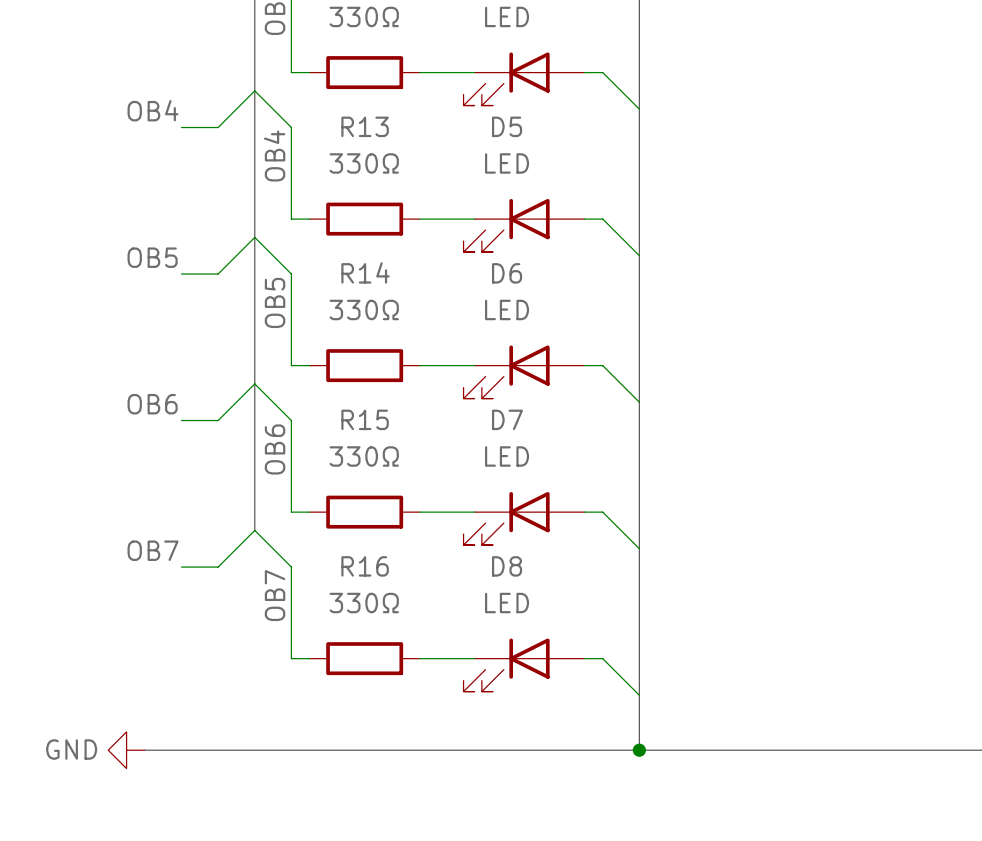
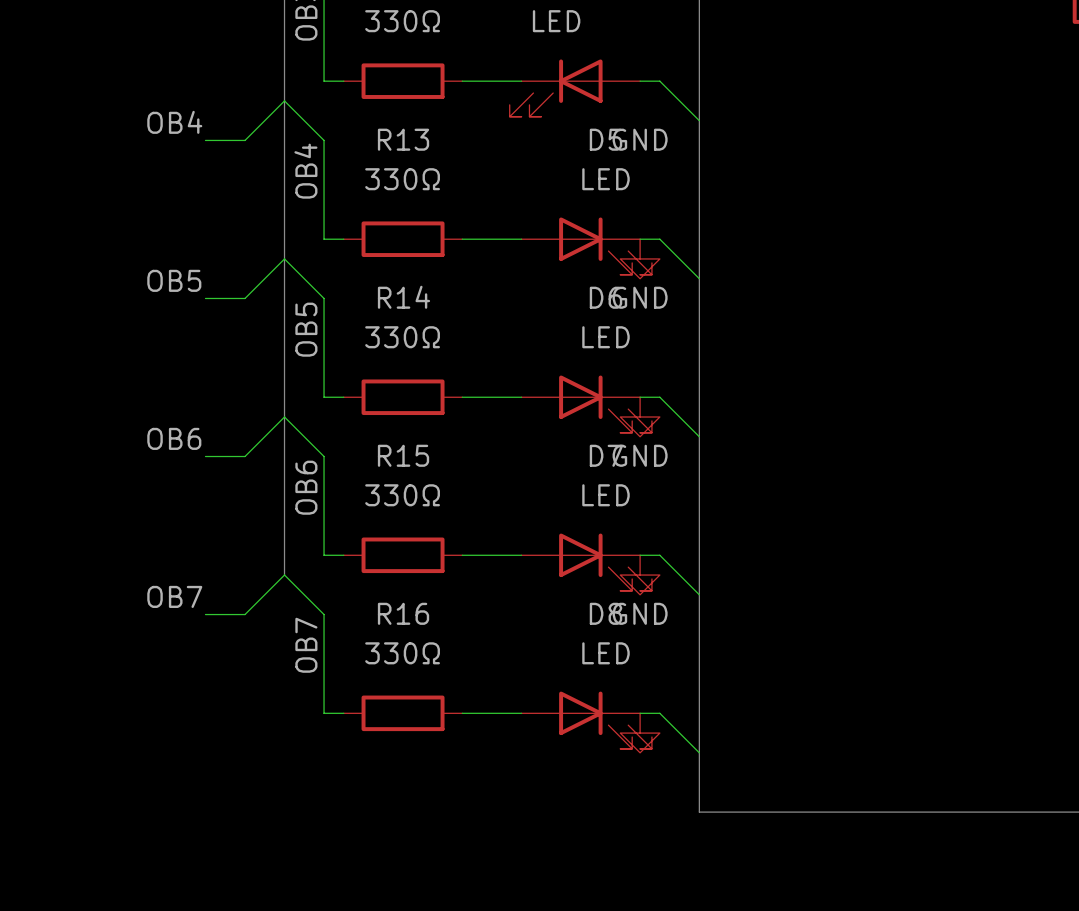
D5 flip: as is (506, 225) -> left-right (605, 246)
power symbol: none -> GND (640, 258)
D6 flip: as is (506, 372) -> left-right (605, 404)
power symbol: none -> GND (640, 417)
D7 flip: as is (506, 518) -> left-right (605, 562)
power symbol: none -> GND (640, 575)
D8 flip: as is (506, 665) -> left-right (605, 720)
power symbol: none -> GND (640, 733)
power symbol: GND (126, 750) -> none
bus: (144, 750) (639, 750) -> none
junction: (639, 750) -> none

